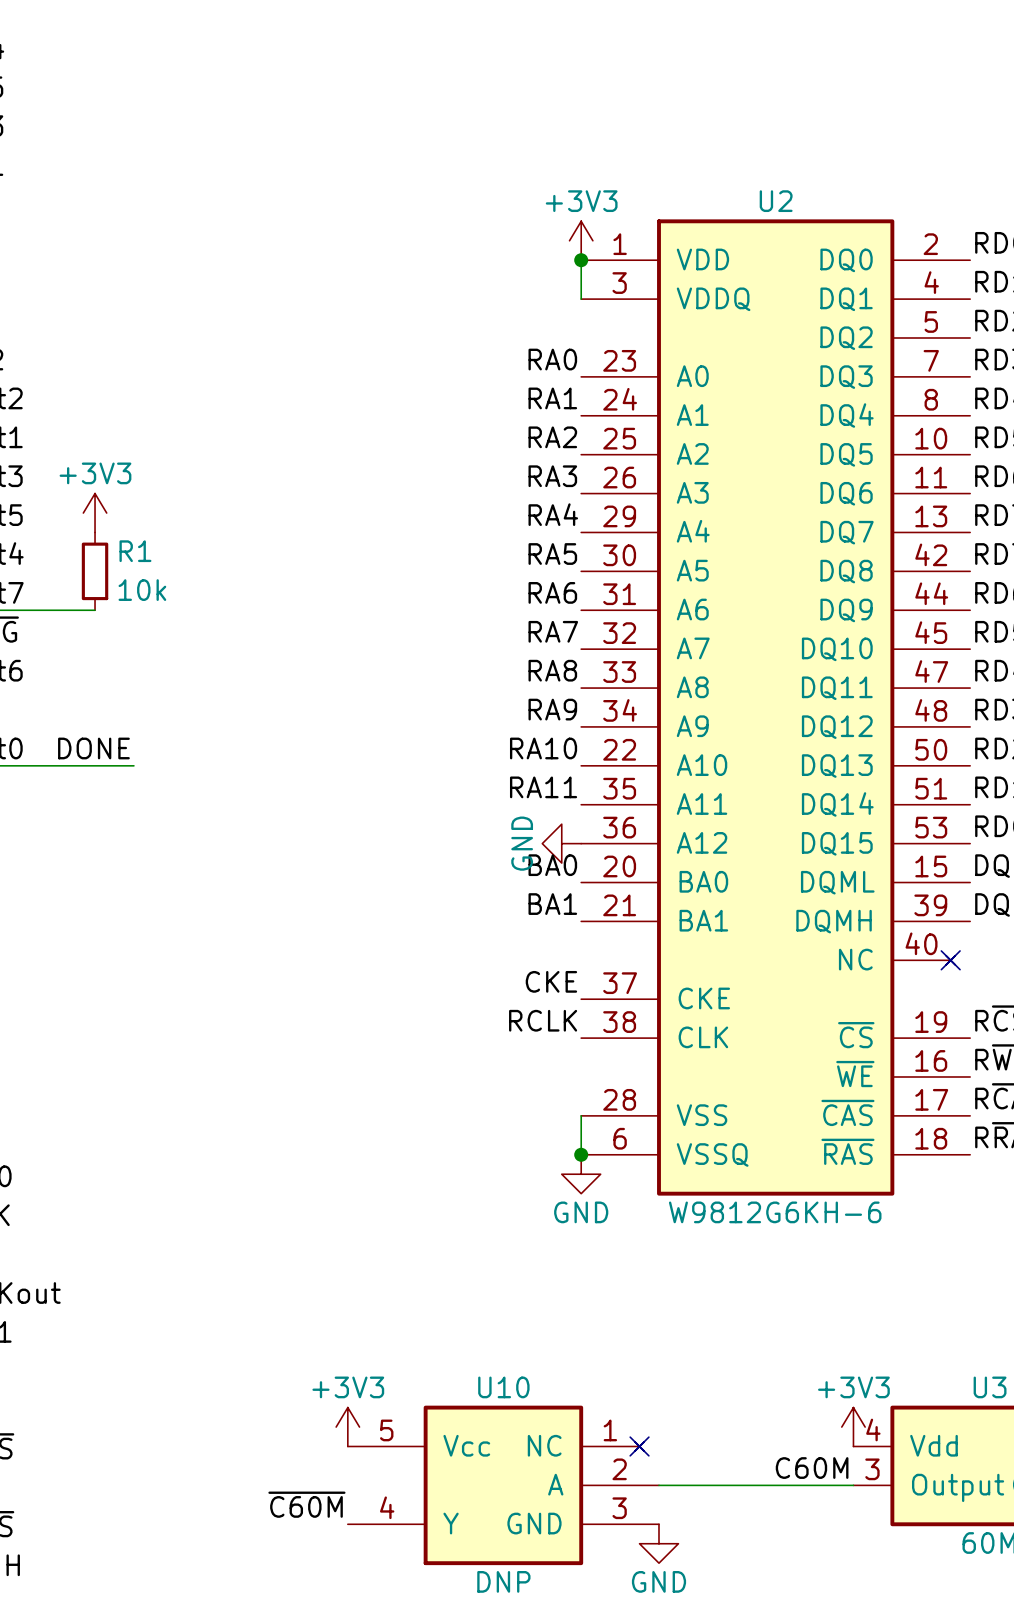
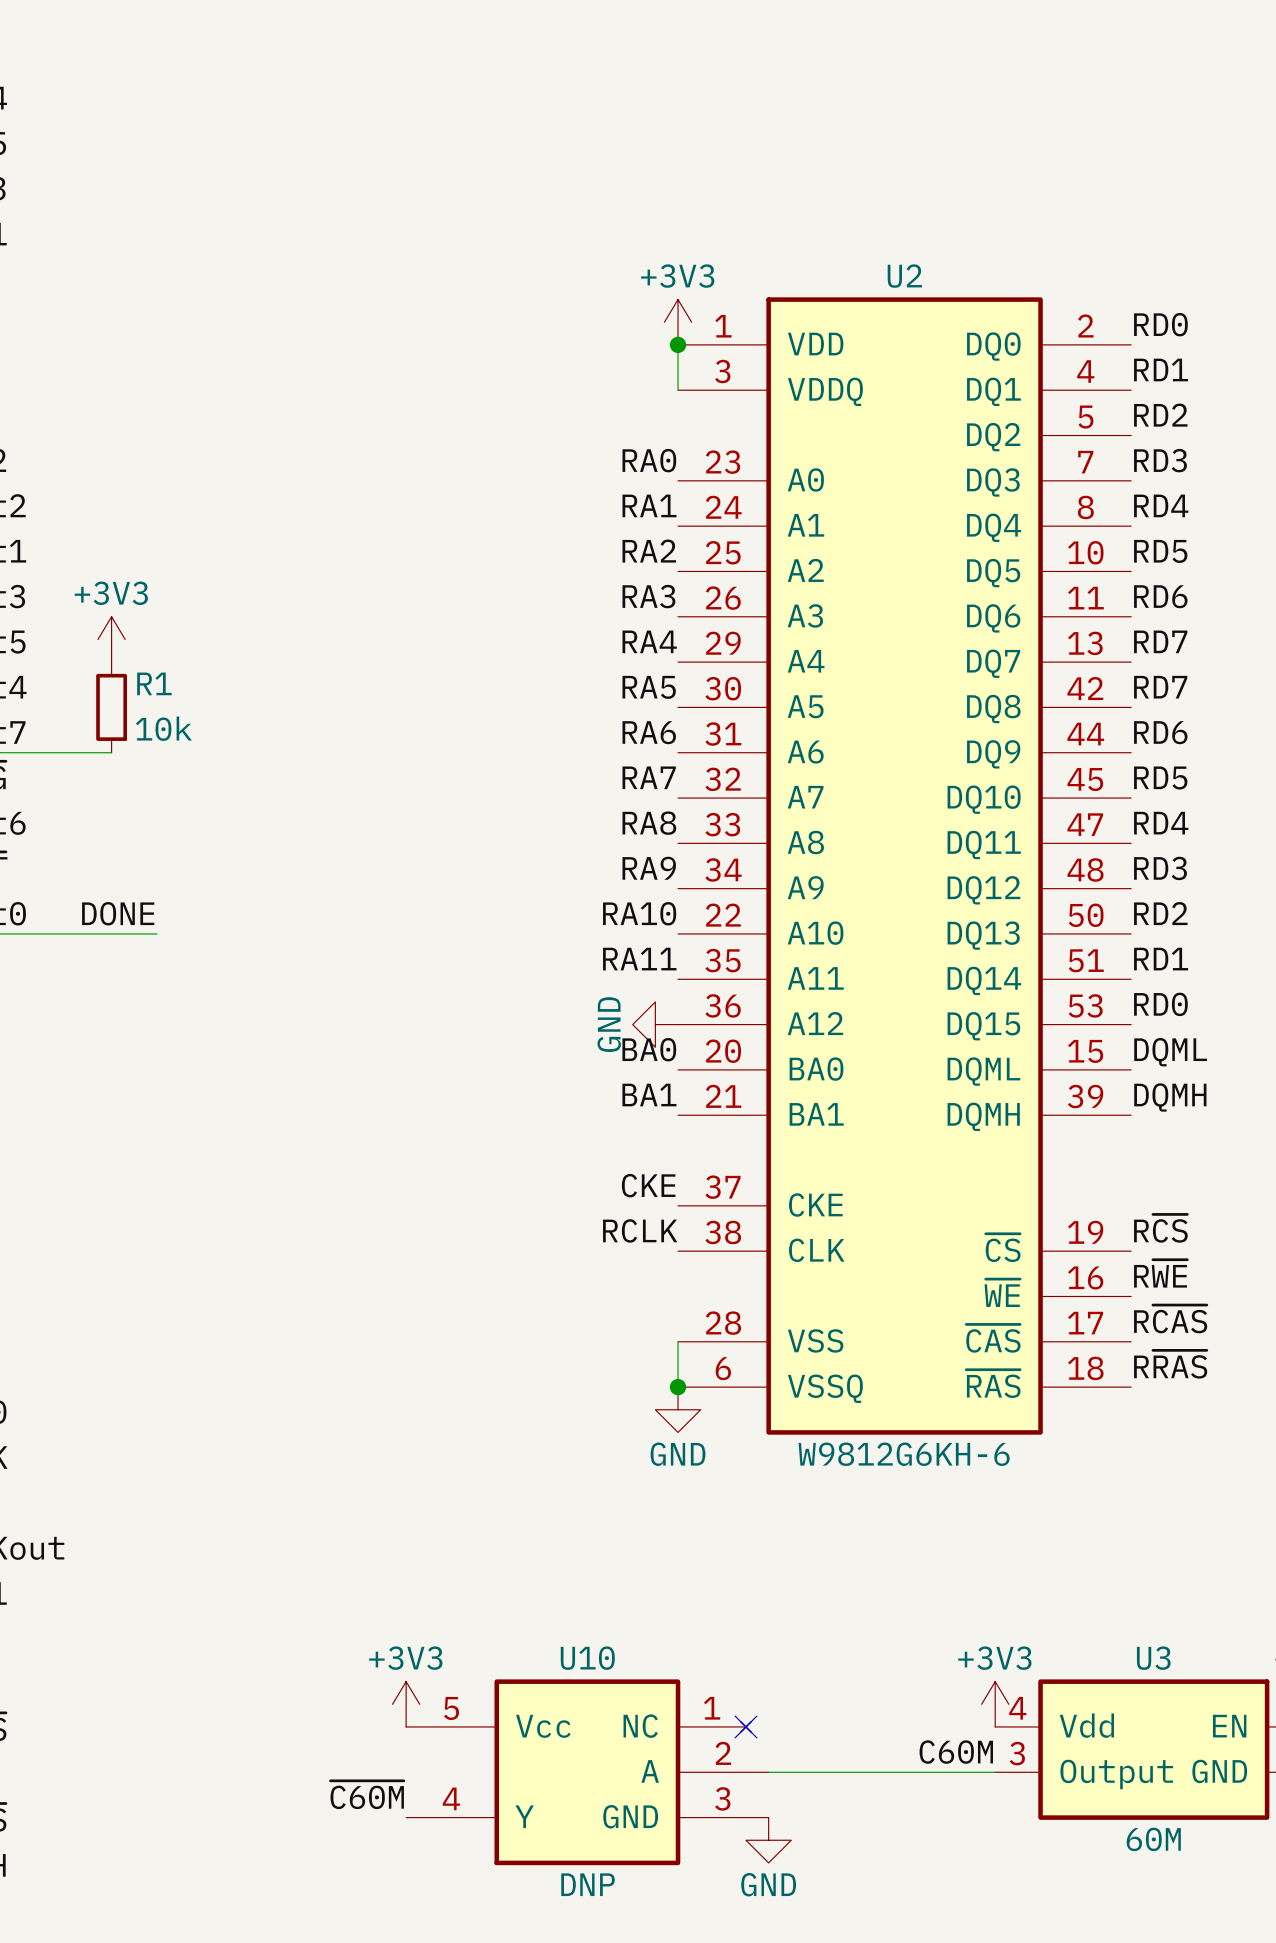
U2 symbol: [581, 219, 971, 1196] -> [678, 297, 1132, 1435]
no-connect mark: (950, 960) -> none

